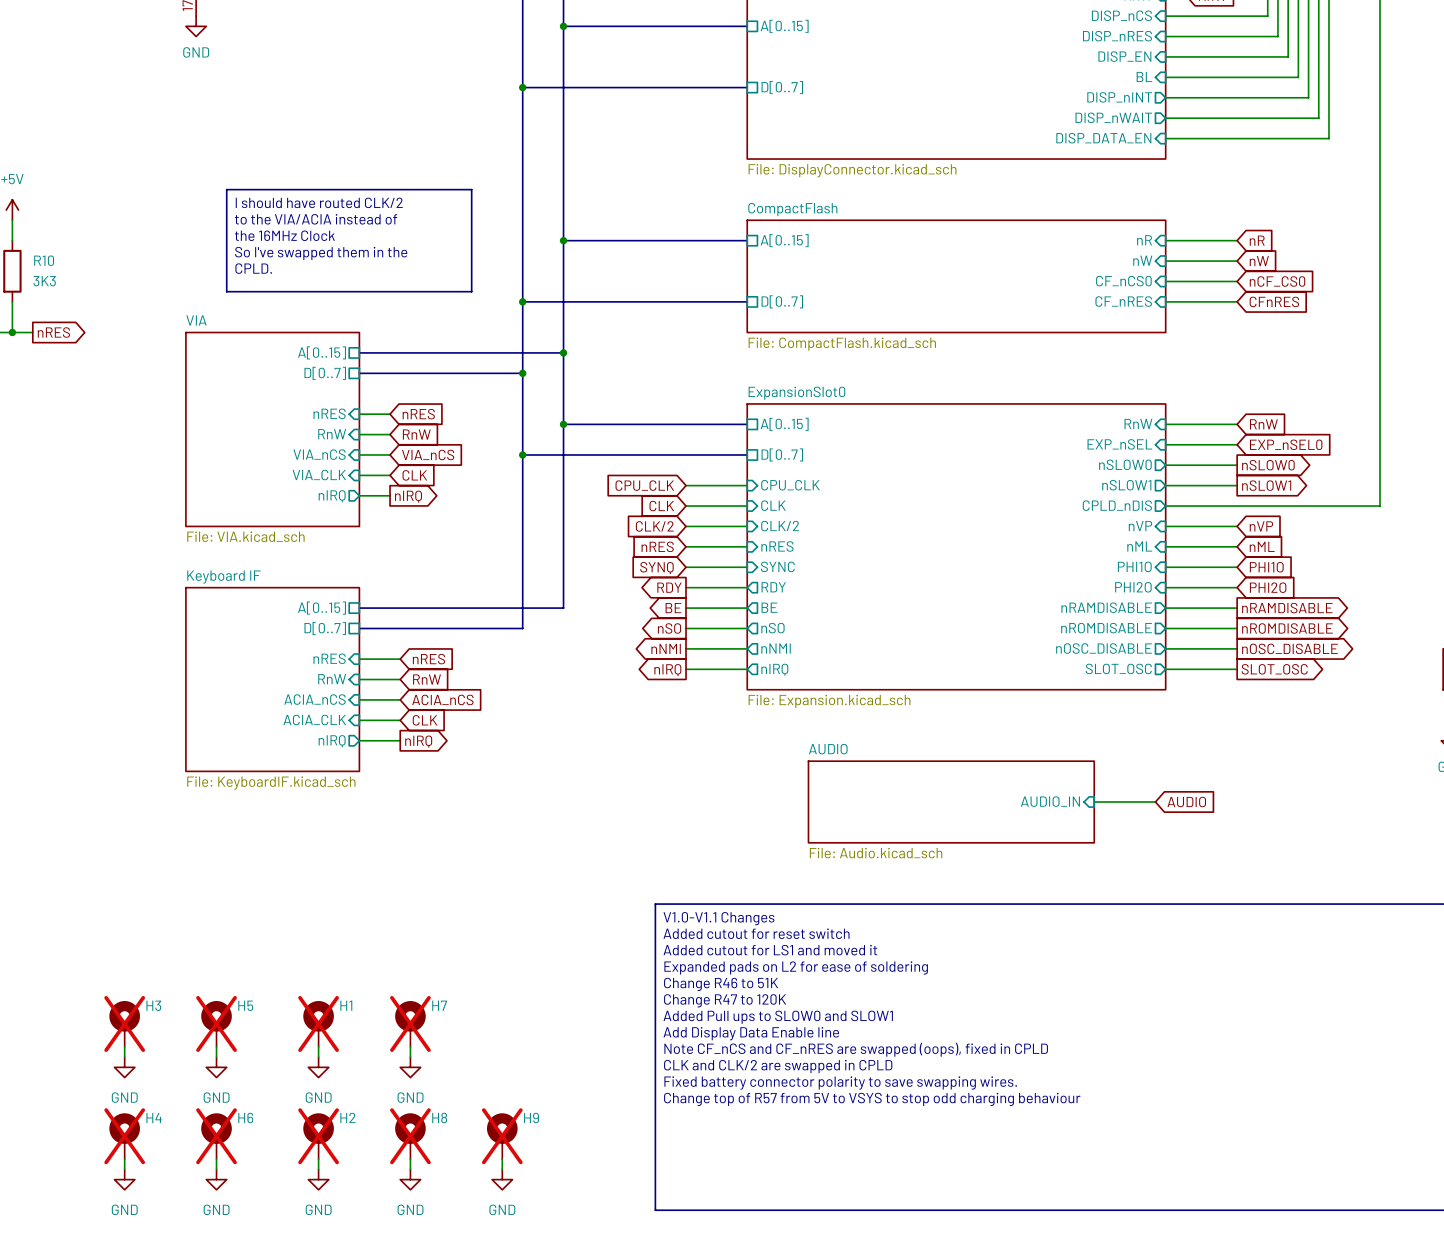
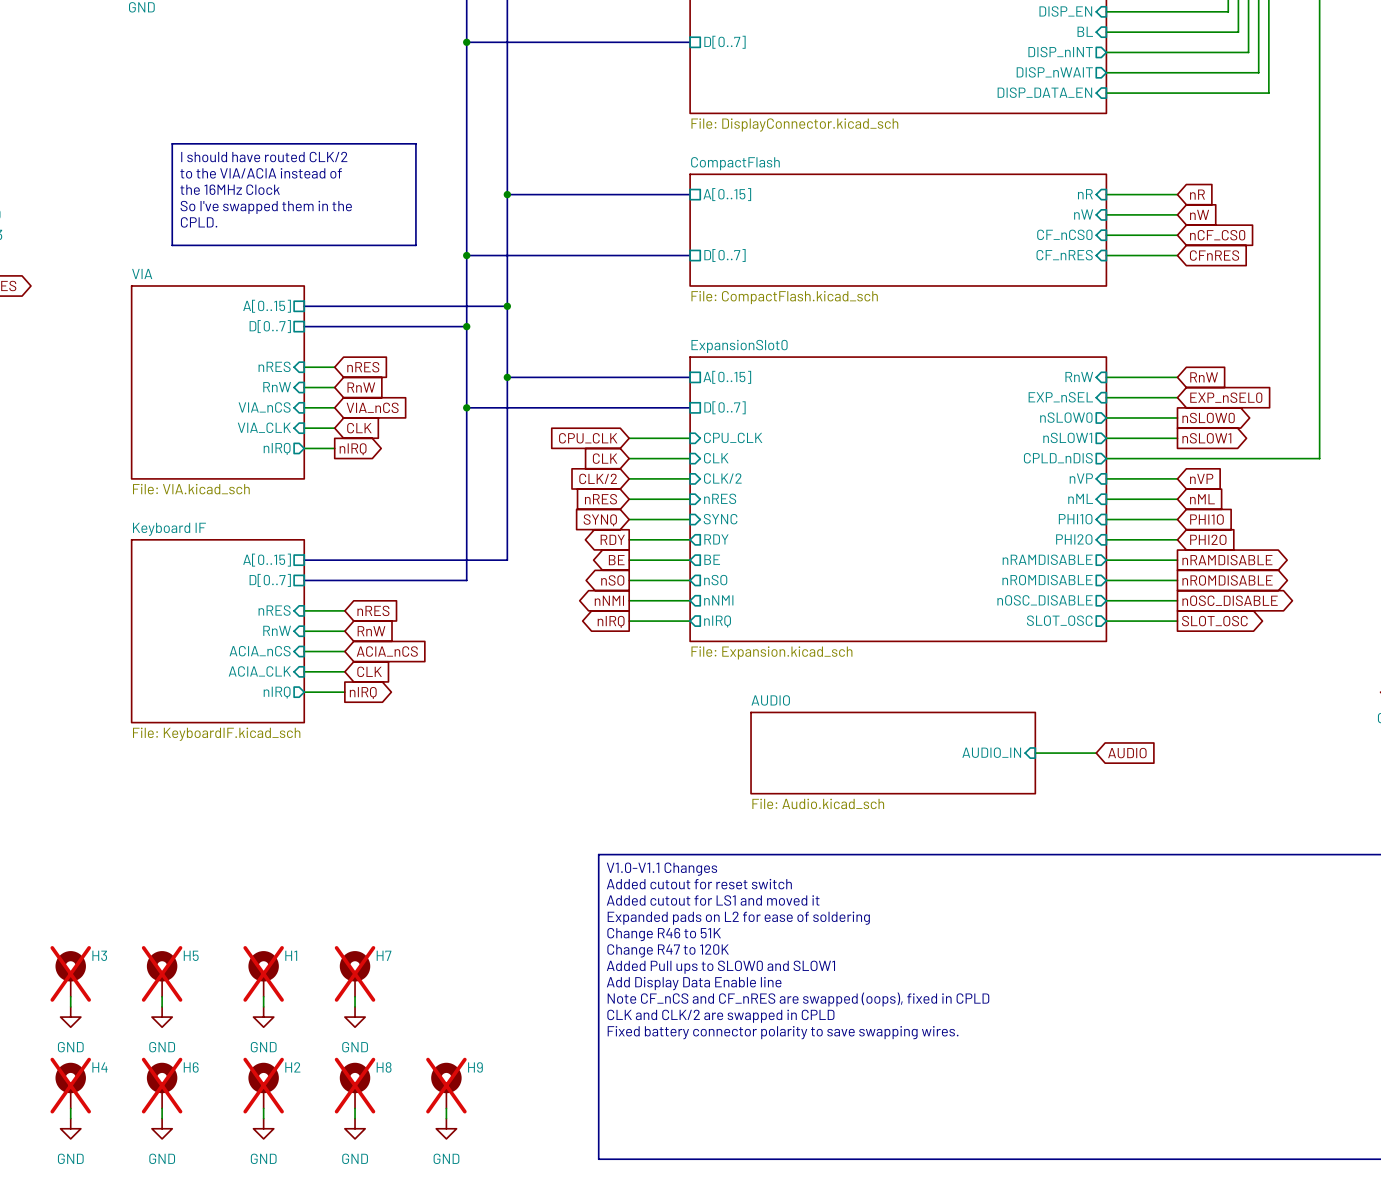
text: Change top of R57 from 5V to VSYS to stop odd charging behaviour (872, 1099) -> none

